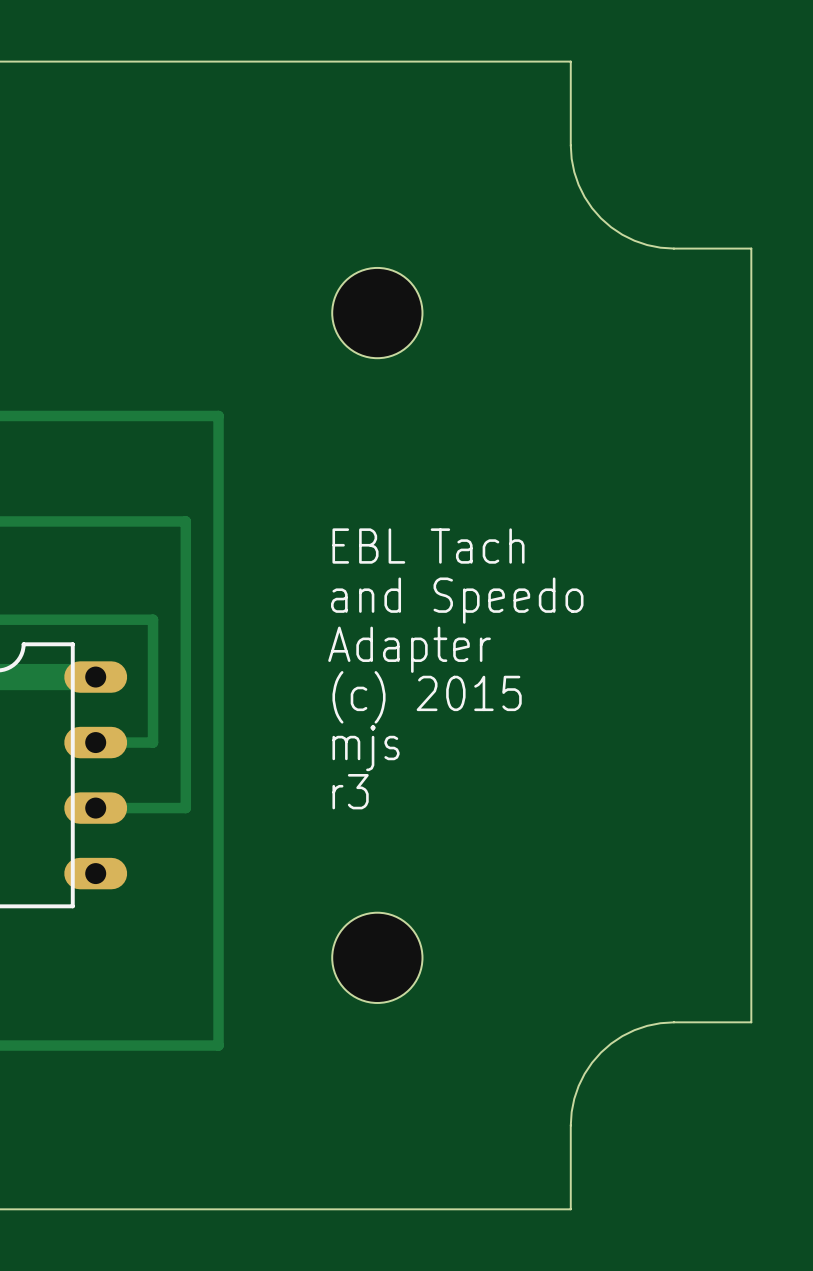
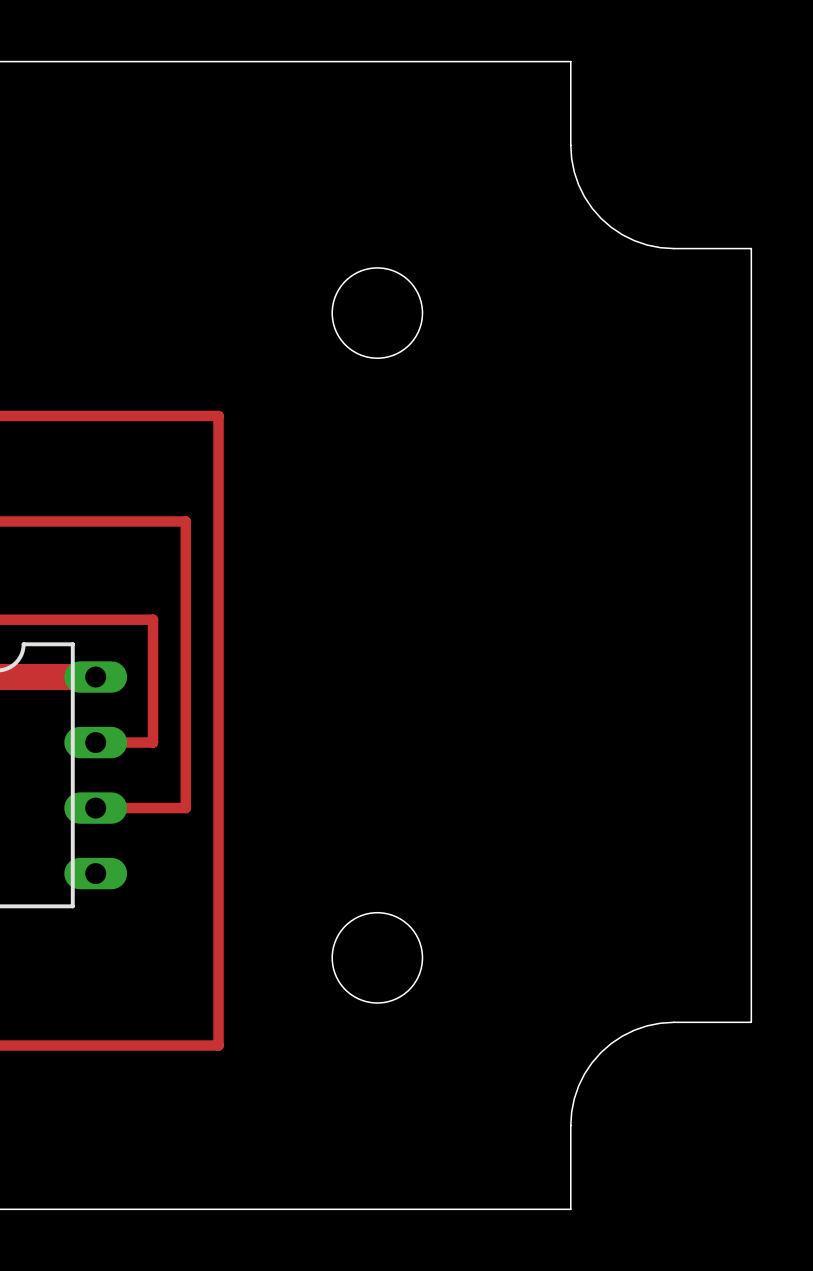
text: EBL Tach (428, 546) -> none
text: and Speedo (457, 600) -> none
text: Adapter (409, 649) -> none
text: (c) 2015 (427, 697) -> none
text: mjs (366, 748) -> none
text: r3 (350, 791) -> none

